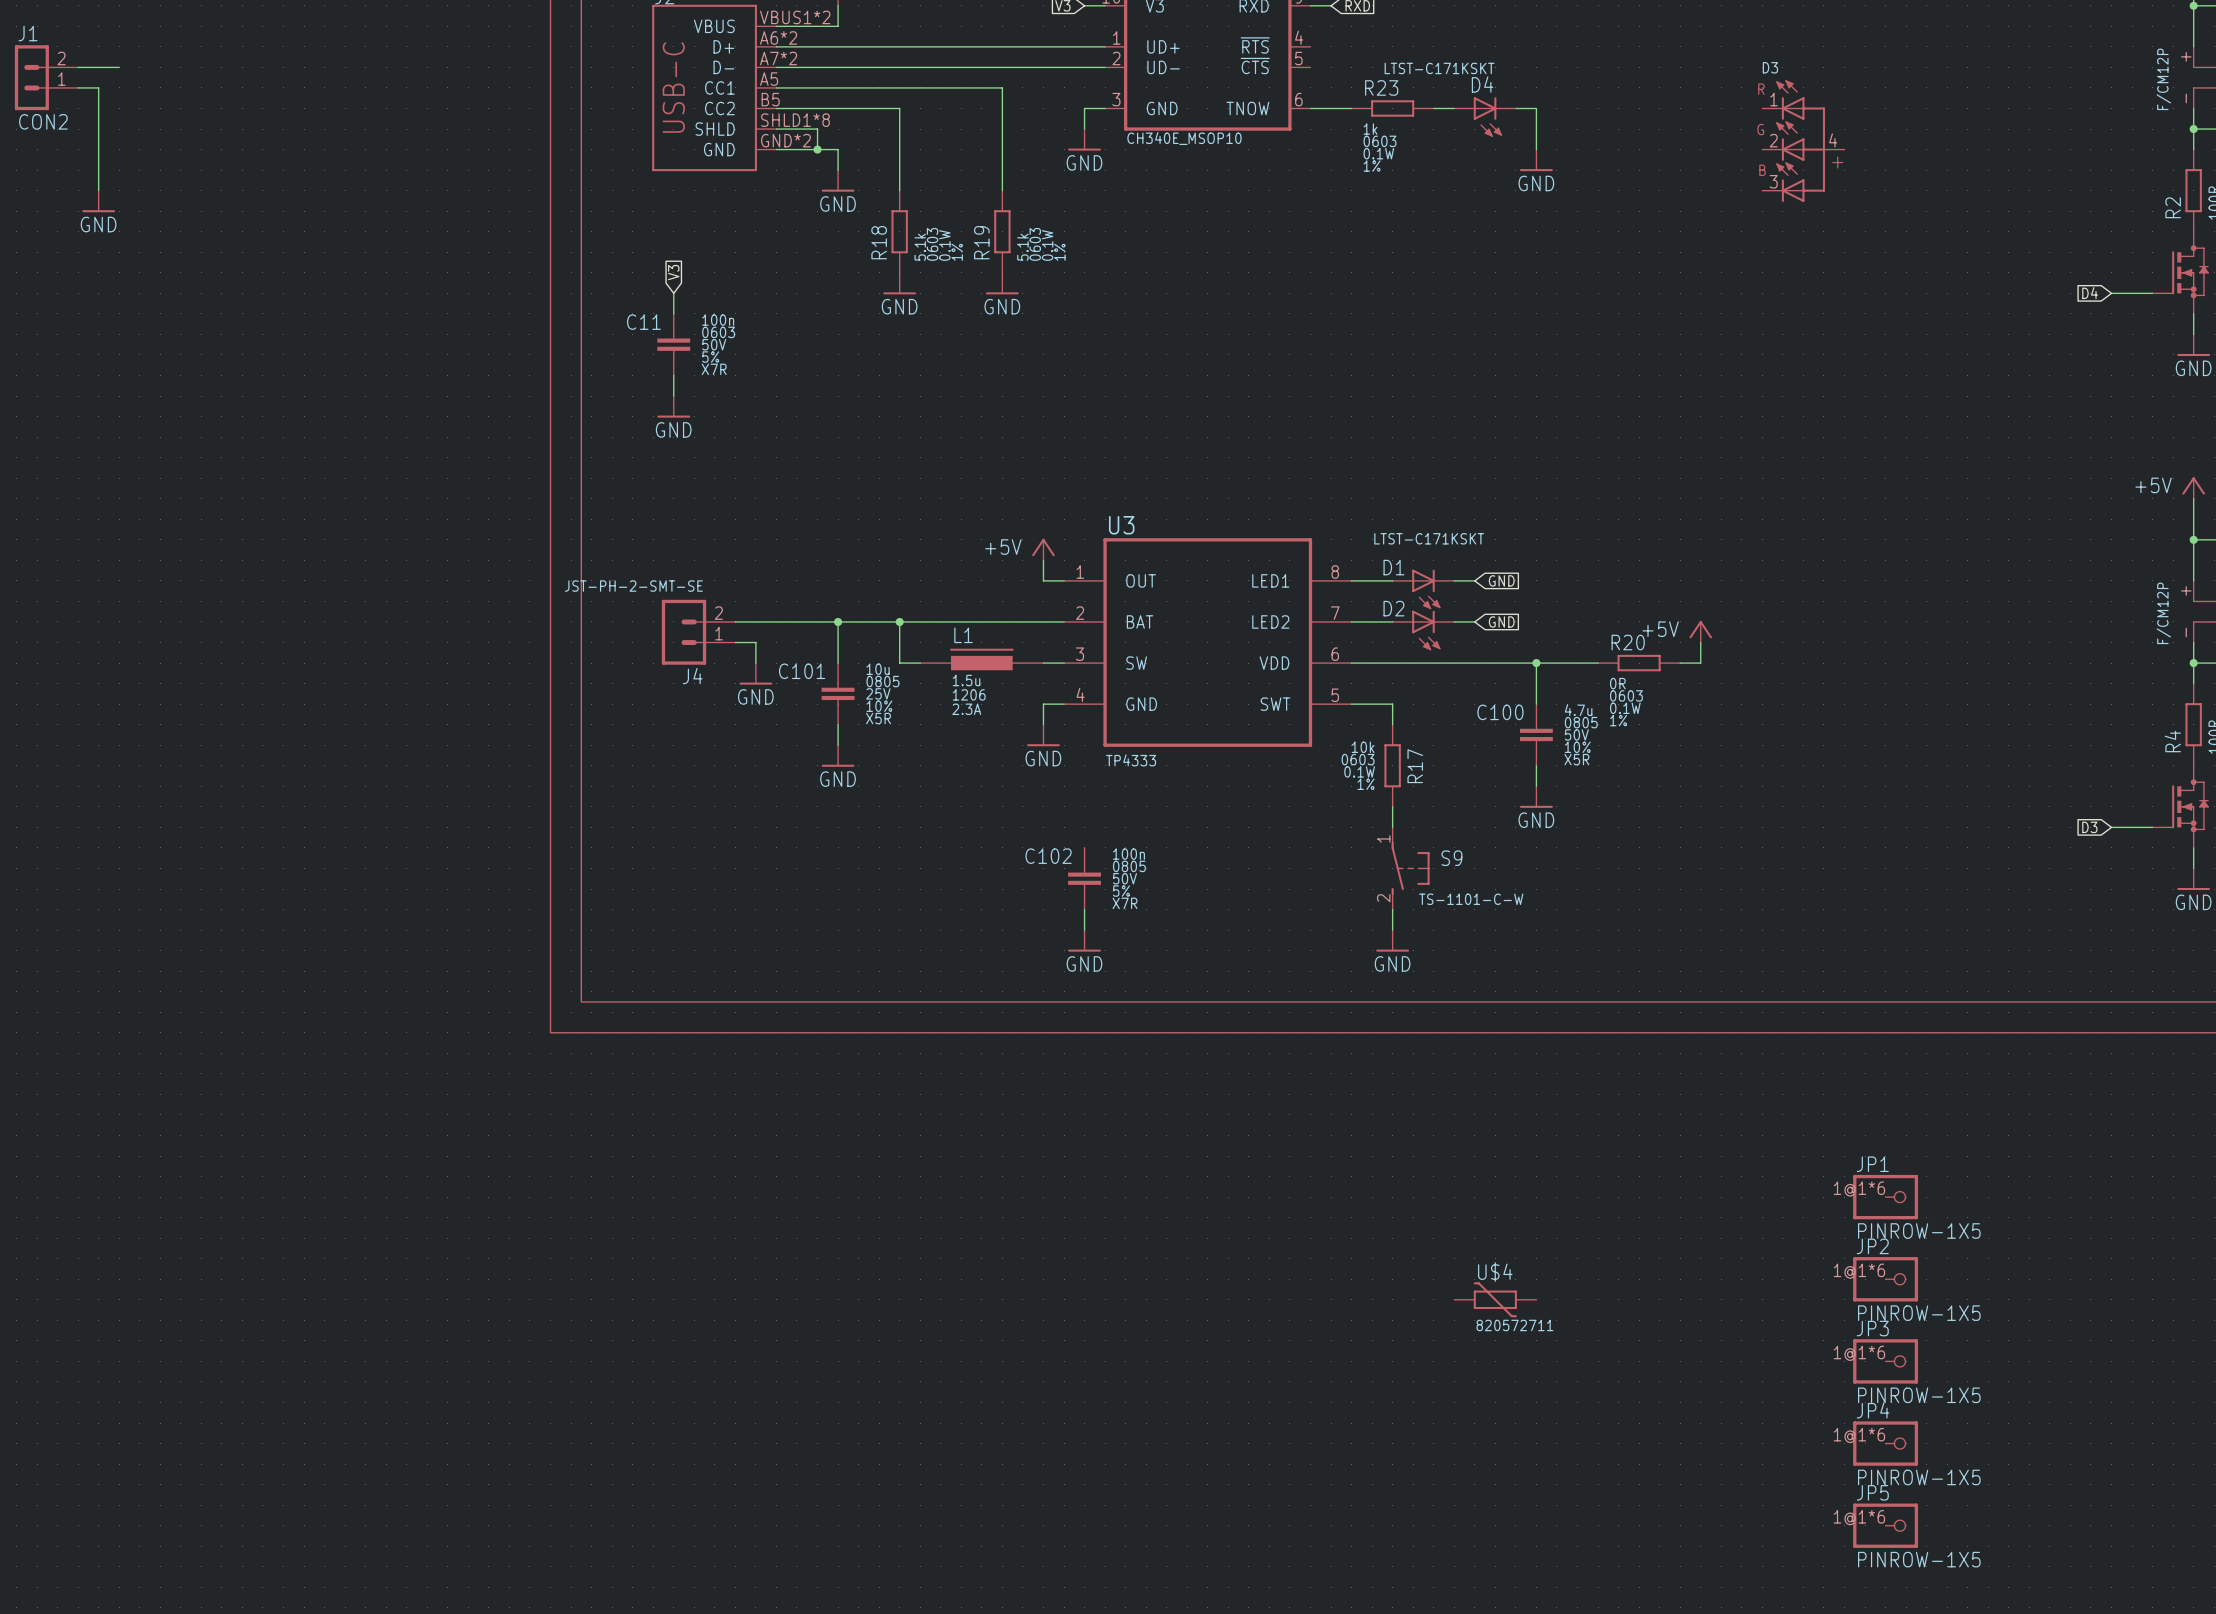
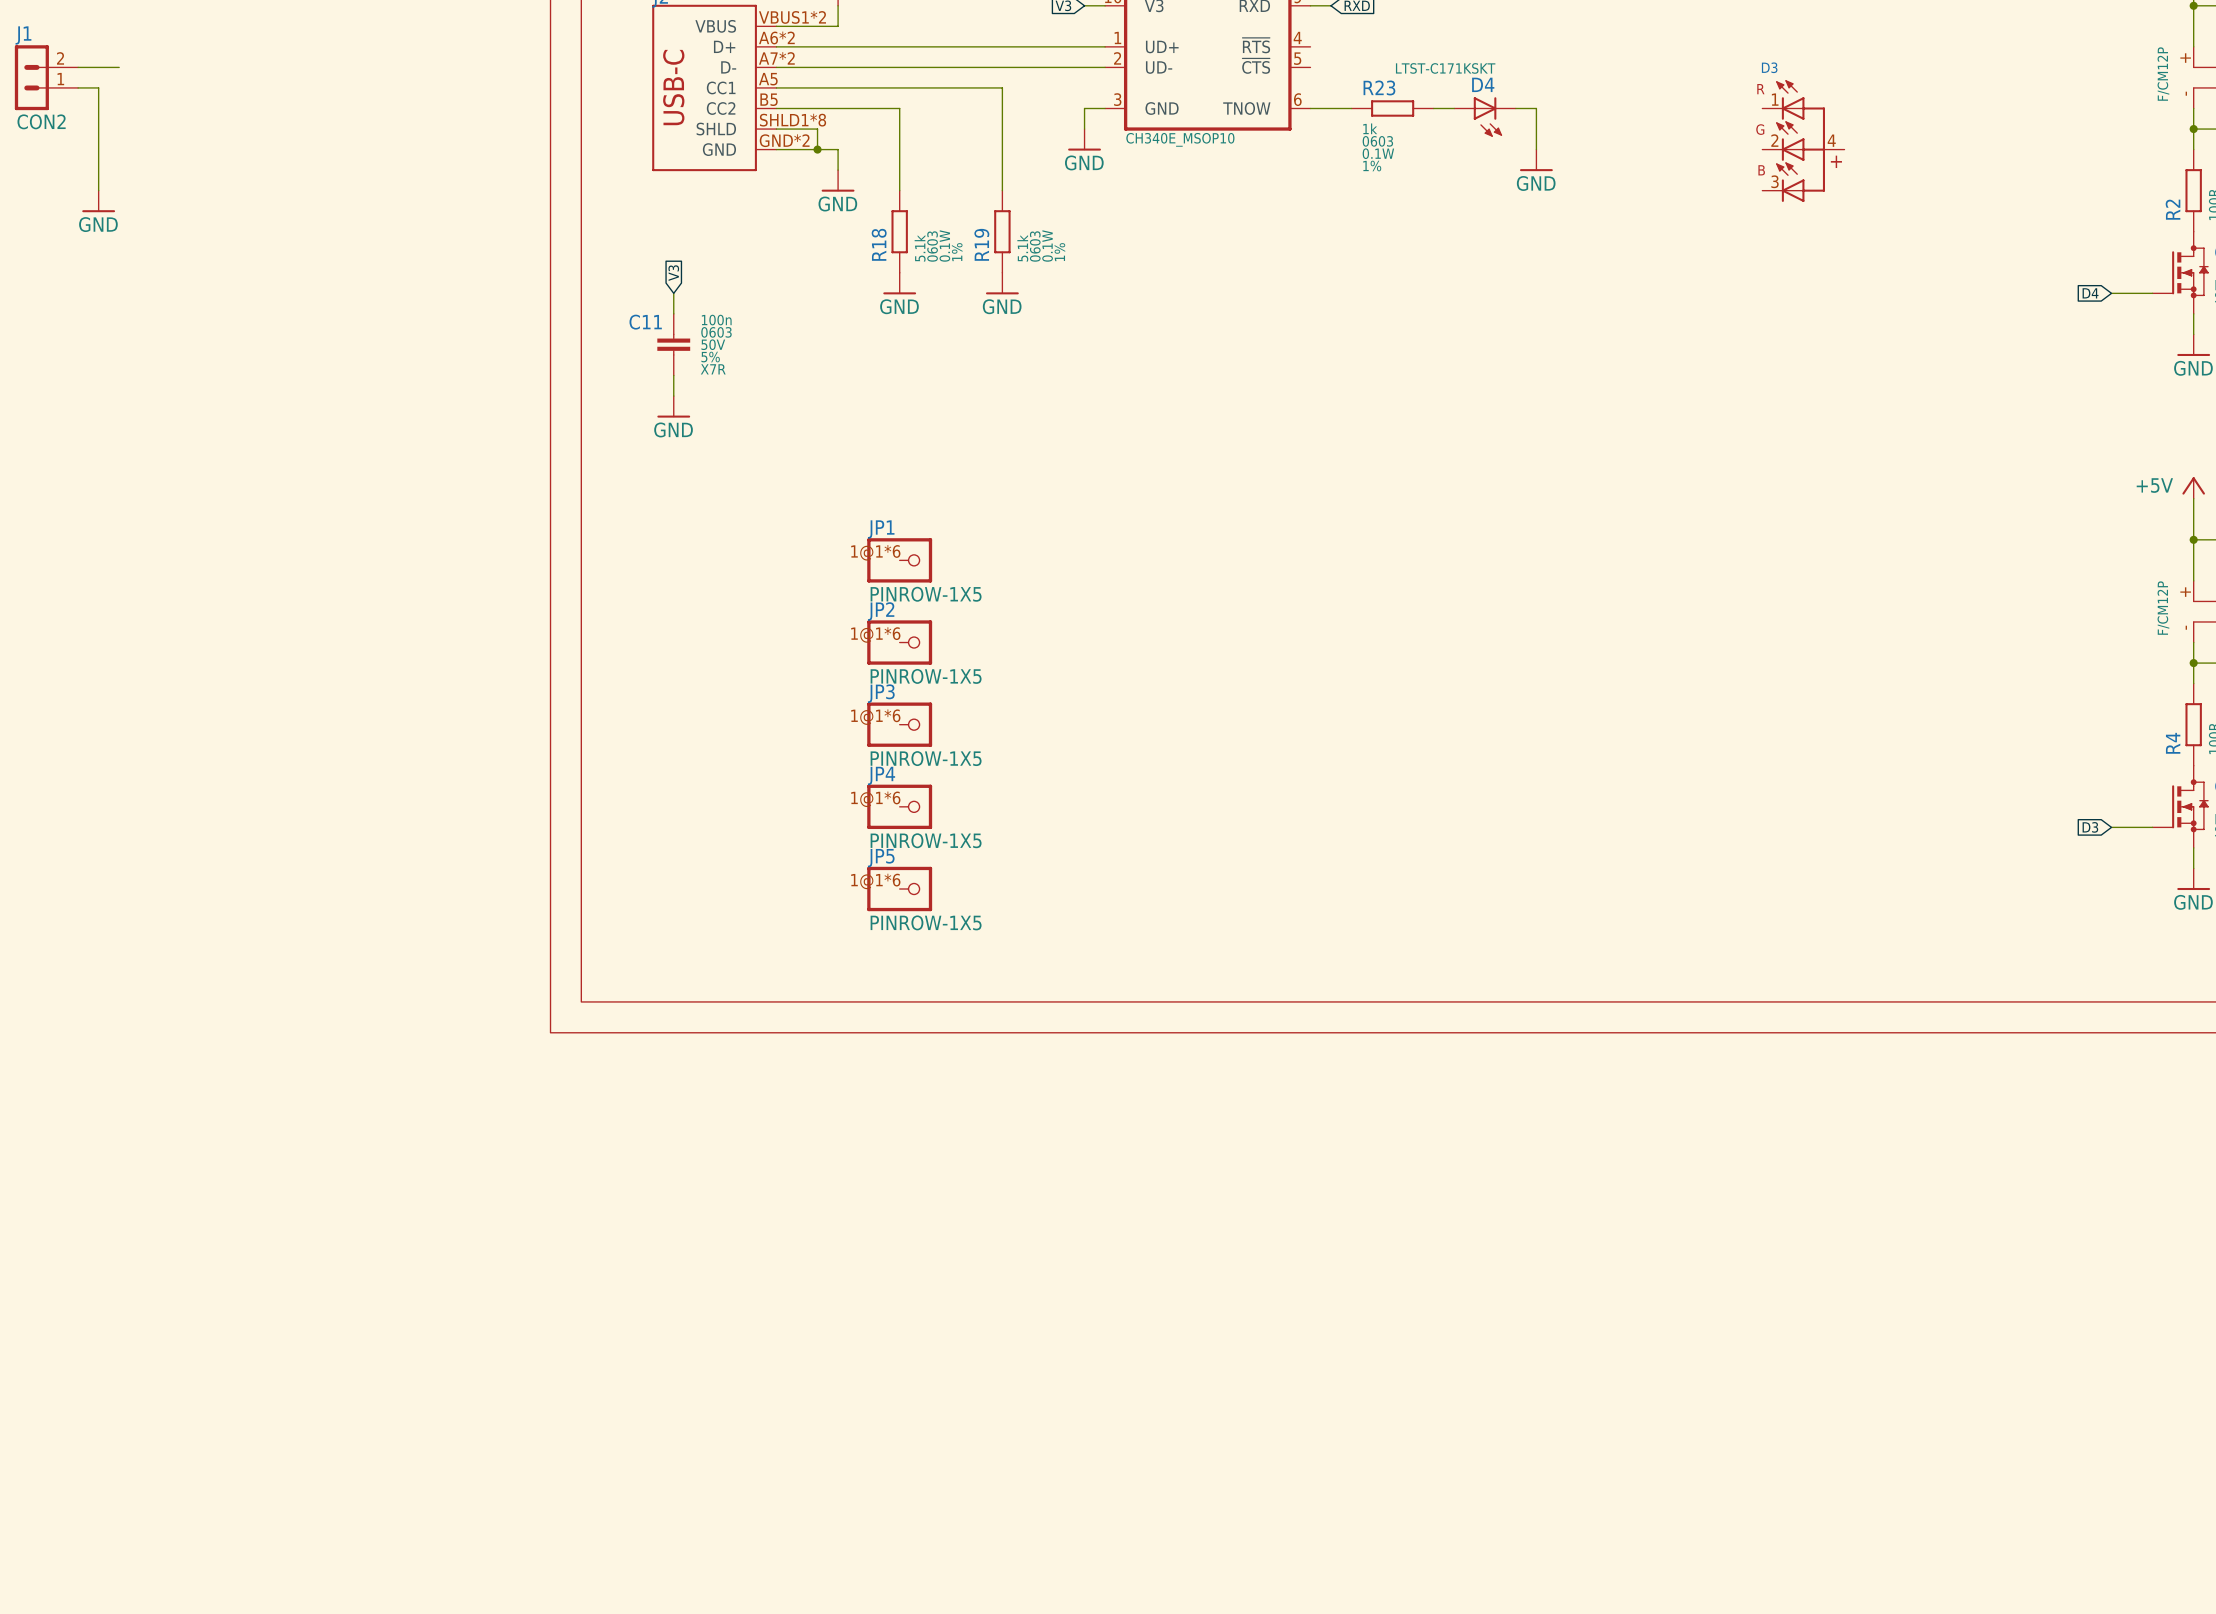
power symbol: +5V (1043, 549) -> none
wire: (1043, 560) (1043, 580) (1064, 580) -> none
wire: (1351, 580) (1392, 580) -> none
wire: (1454, 580) (1474, 580) -> none
global label: GND (1501, 580) -> none
D1: LTST-C171KSKT (1423, 589) -> none
wire: (735, 621) (1064, 621) -> none
wire: (838, 621) (838, 663) -> none
junction: (838, 621) -> none
wire: (899, 621) (899, 663) (920, 663) -> none
junction: (899, 621) -> none
wire: (1351, 621) (1392, 621) -> none
wire: (1454, 621) (1474, 621) -> none
global label: GND (1501, 621) -> none
D2: (1423, 630) -> none
power symbol: +5V (1700, 631) -> none
J4: JST-PH-2-SMT-SE (698, 632) -> none
wire: (735, 642) (755, 642) (755, 663) -> none
U3: TP4333 (1207, 642) -> none
wire: (1700, 642) (1700, 663) (1680, 663) -> none
L1: 1.5u (981, 659) -> none
wire: (1043, 663) (1064, 663) -> none
wire: (1351, 663) (1598, 663) -> none
wire: (1536, 663) (1536, 704) -> none
junction: (1536, 663) -> none
R20: 0R (1639, 663) -> none
power symbol: GND (755, 673) -> none
C101: 10u (838, 693) -> none
wire: (1064, 704) (1043, 704) (1043, 724) -> none
wire: (1351, 704) (1392, 704) (1392, 724) -> none
wire: (838, 724) (838, 745) -> none
C100: 4.7u (1536, 734) -> none
power symbol: GND (1043, 735) -> none
power symbol: GND (838, 756) -> none
R17: 10k (1392, 765) -> none
wire: (1536, 765) (1536, 786) -> none
power symbol: GND (1536, 797) -> none
wire: (1392, 806) (1392, 827) -> none
S9: TS-1101-C-W (1410, 868) -> none
C102: 100n (1084, 878) -> none
wire: (1084, 909) (1084, 930) -> none
wire: (1392, 909) (1392, 930) -> none
power symbol: GND (1084, 940) -> none
power symbol: GND (1392, 940) -> none
JP1 position: (1885, 1197) -> (899, 560)
JP2 position: (1885, 1279) -> (899, 642)
U$4: 820572711 (1495, 1299) -> none
JP3 position: (1885, 1361) -> (899, 724)
JP4 position: (1885, 1443) -> (899, 806)
JP5 position: (1885, 1525) -> (899, 889)

